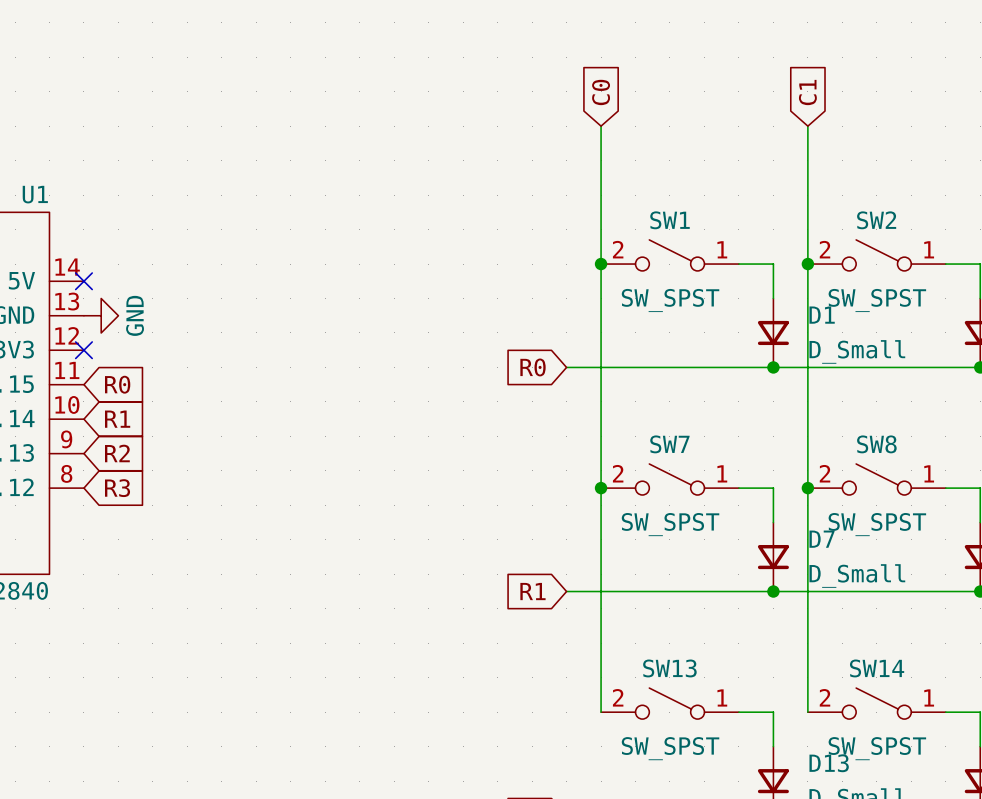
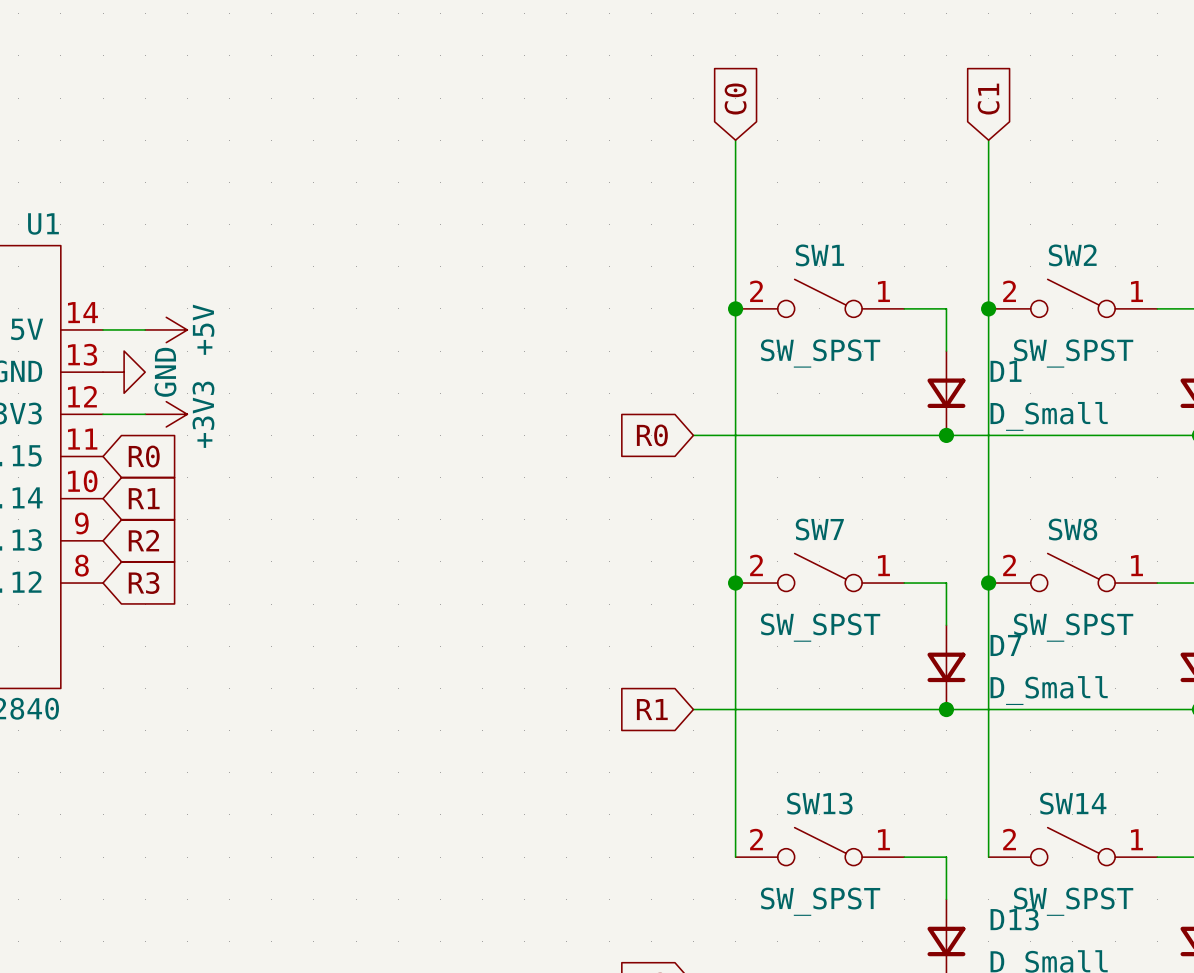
wire: none -> (103, 329) (145, 329)
no-connect mark: (83, 281) -> none
power symbol: none -> +5V (166, 329)
wire: none -> (103, 414) (145, 414)
no-connect mark: (83, 350) -> none
power symbol: none -> +3V3 (166, 414)

